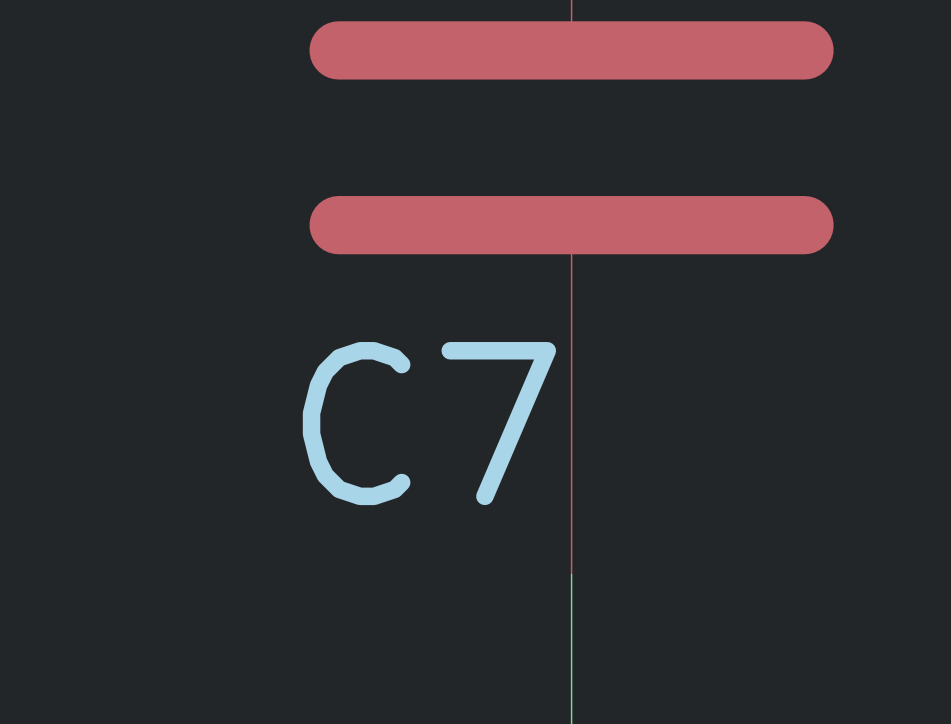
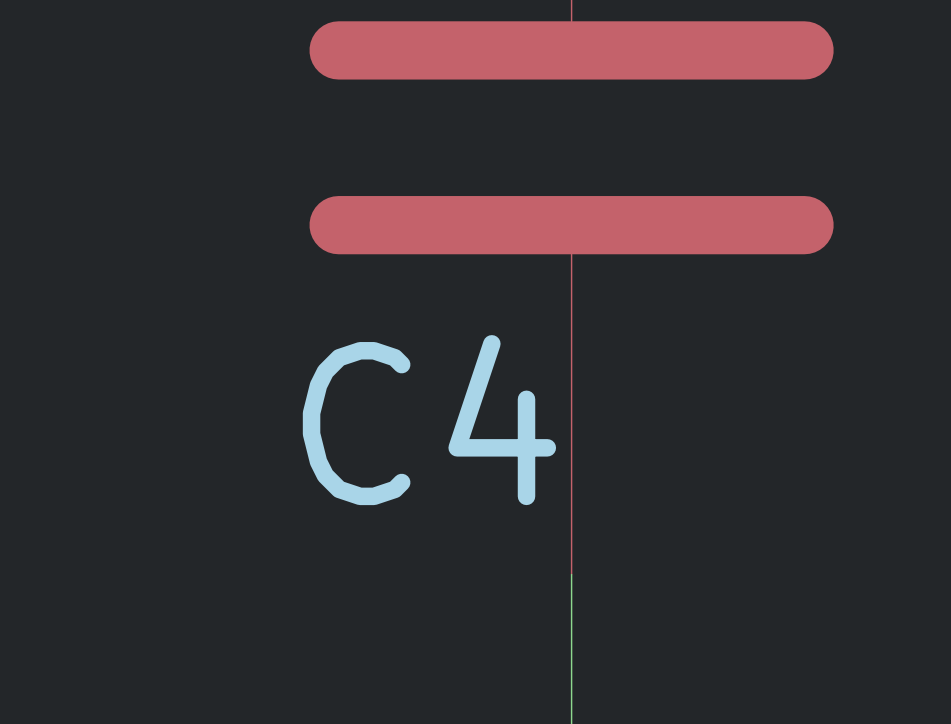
C7 name: C7 (429, 423) -> C4 (429, 420)

